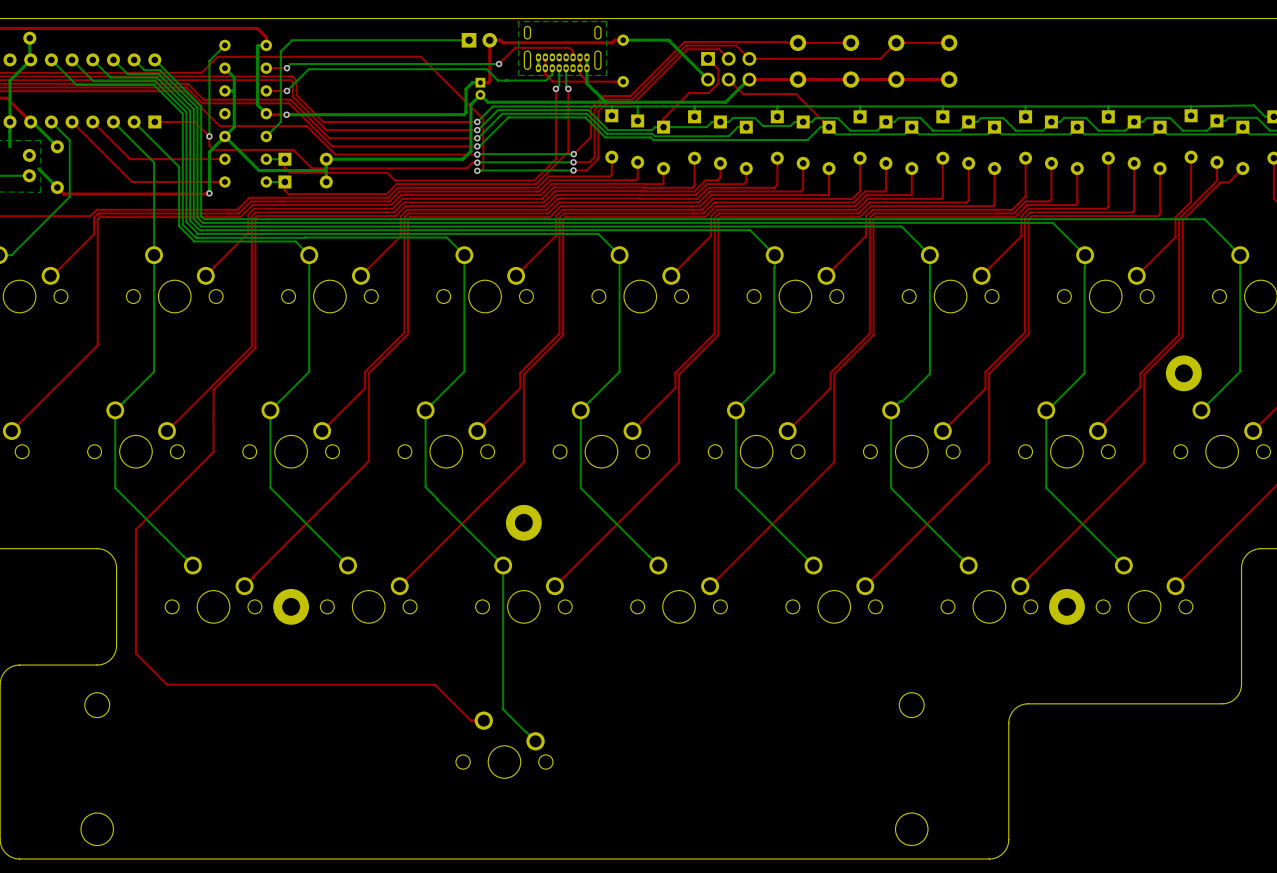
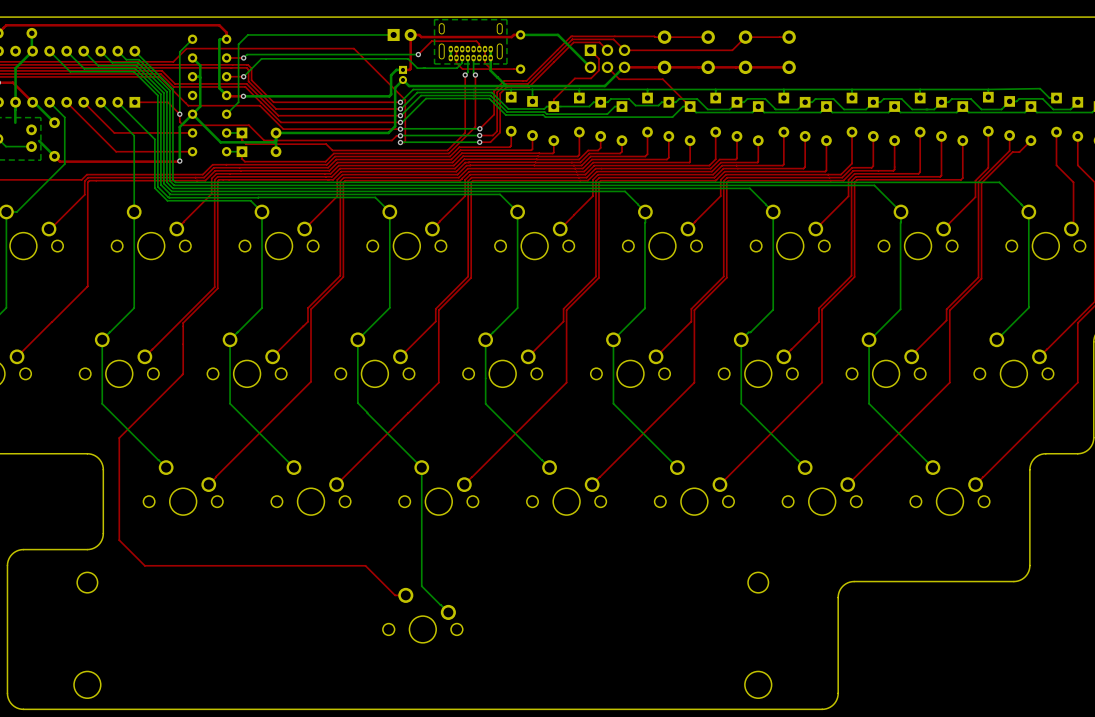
part: (1183, 373) -> none
part: (523, 522) -> none
part: (291, 606) -> none
part: (1066, 606) -> none

